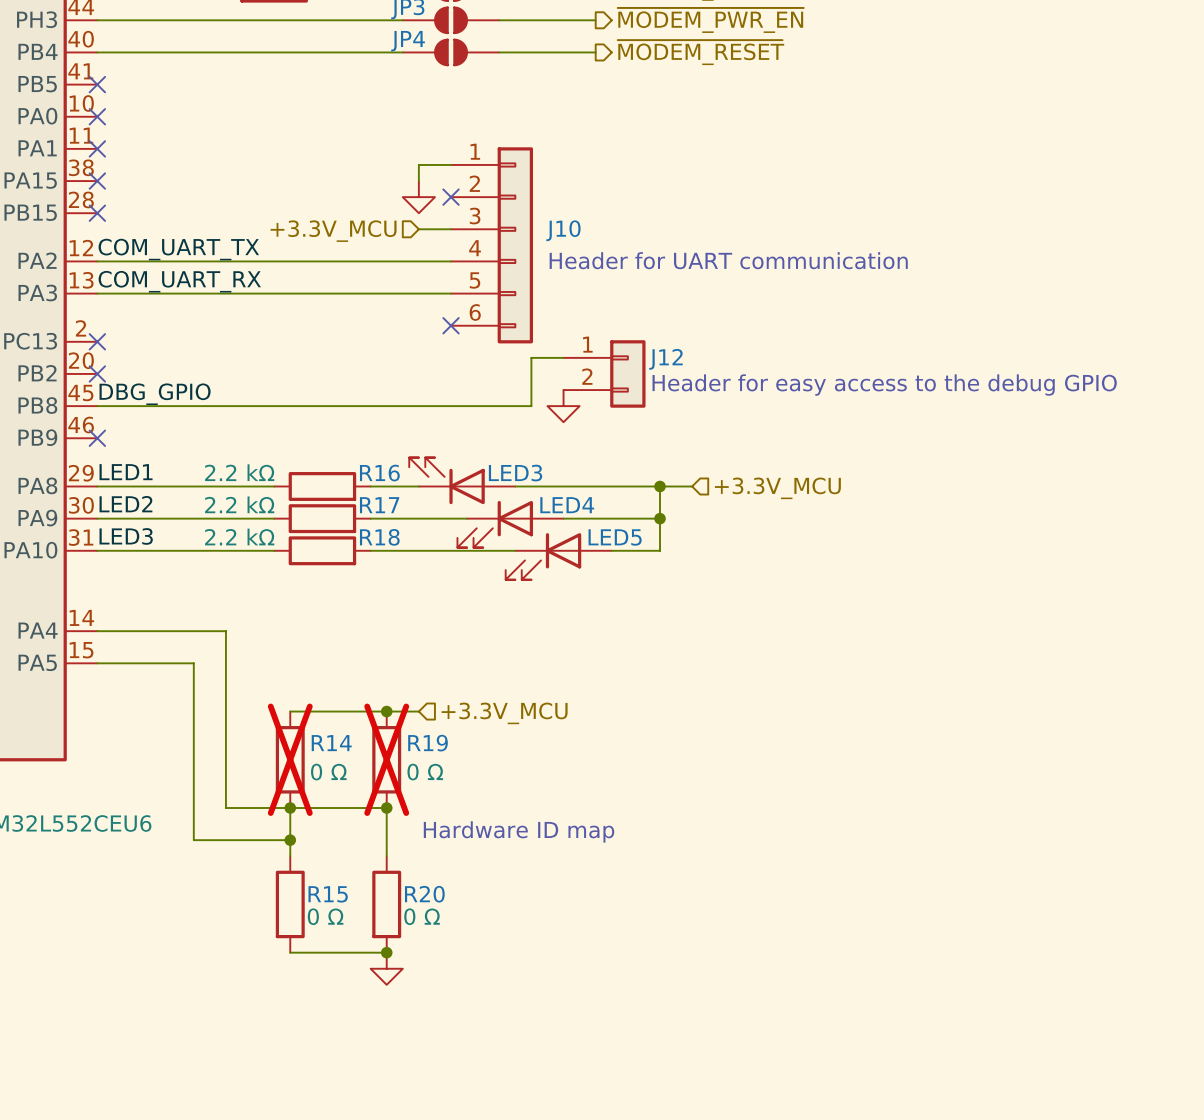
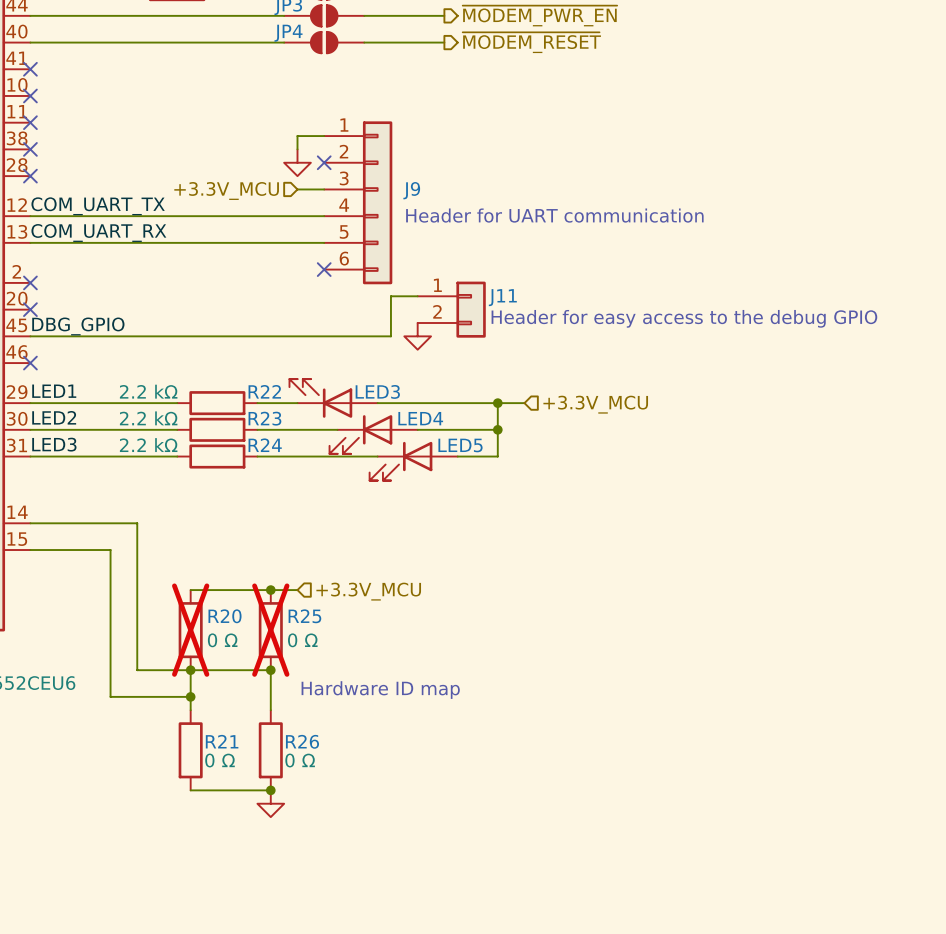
J10 name: J10 (563, 230) -> J9 (411, 190)
J12 name: J12 (665, 359) -> J11 (502, 297)
R16 name: R16 (379, 473) -> R22 (264, 391)
R17 name: R17 (379, 505) -> R23 (264, 418)
R18 name: R18 (379, 537) -> R24 (265, 445)
R14 name: R14 (331, 743) -> R20 (225, 616)
R19 name: R19 (428, 743) -> R25 (304, 616)
R15 name: R15 (328, 894) -> R21 (222, 741)
R20 name: R20 (424, 894) -> R26 (302, 741)

